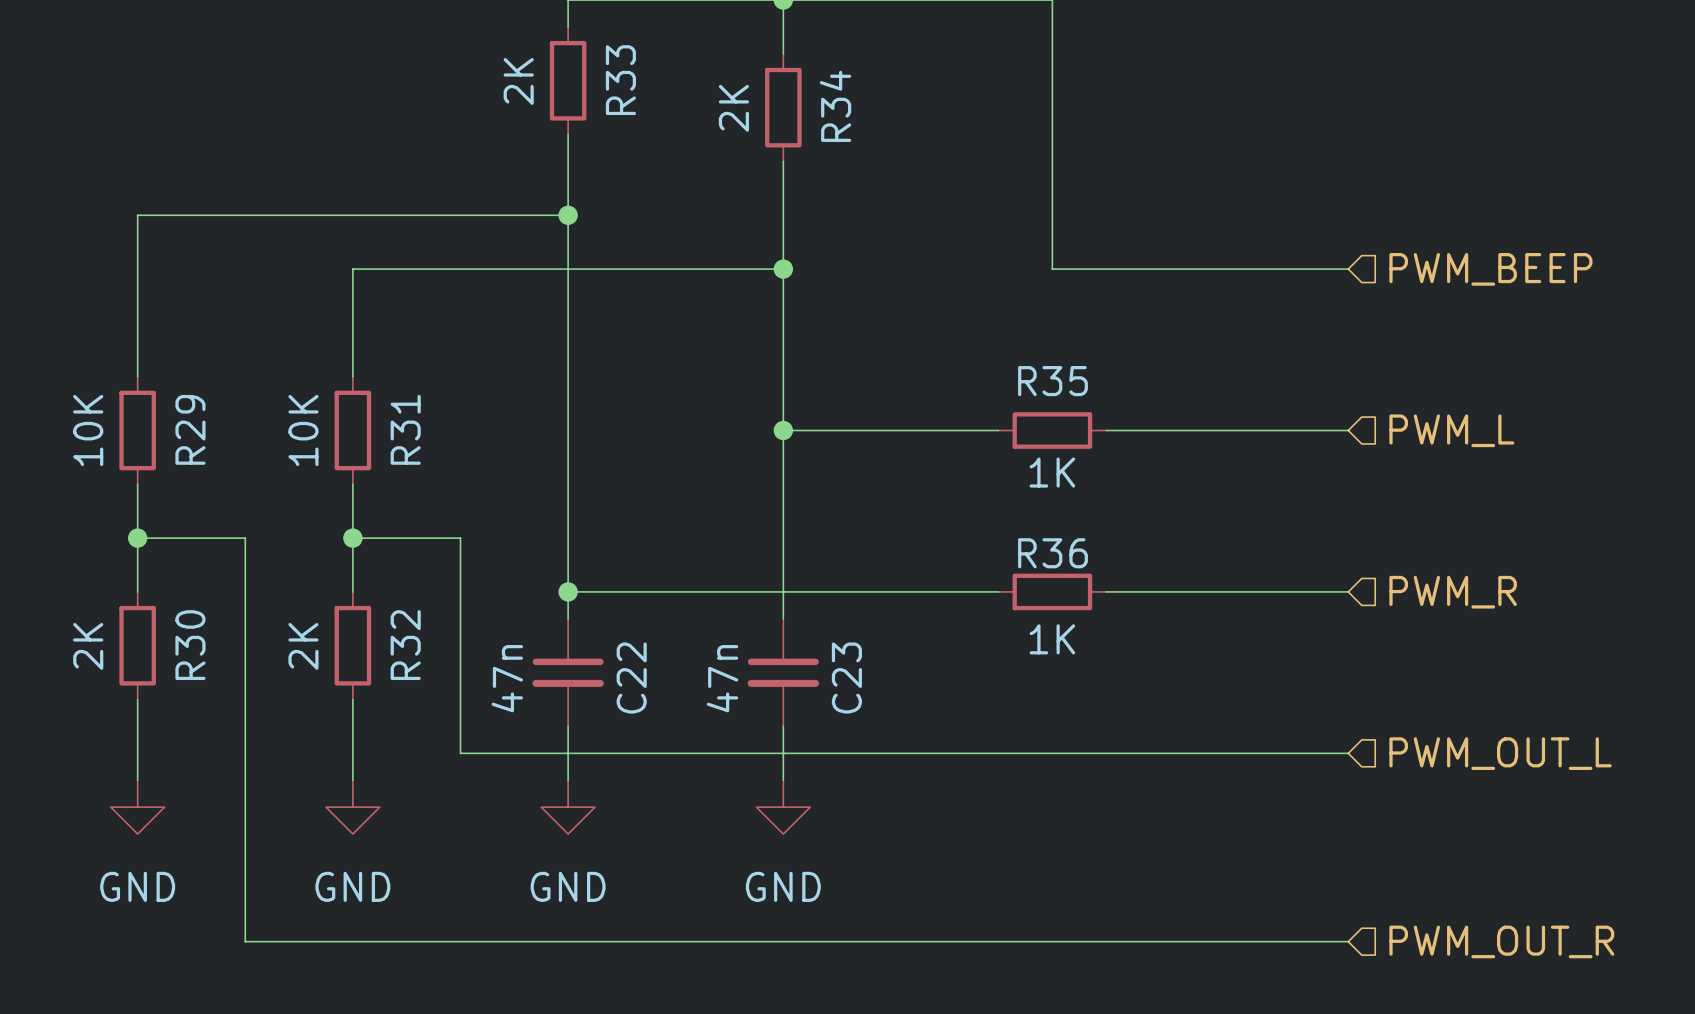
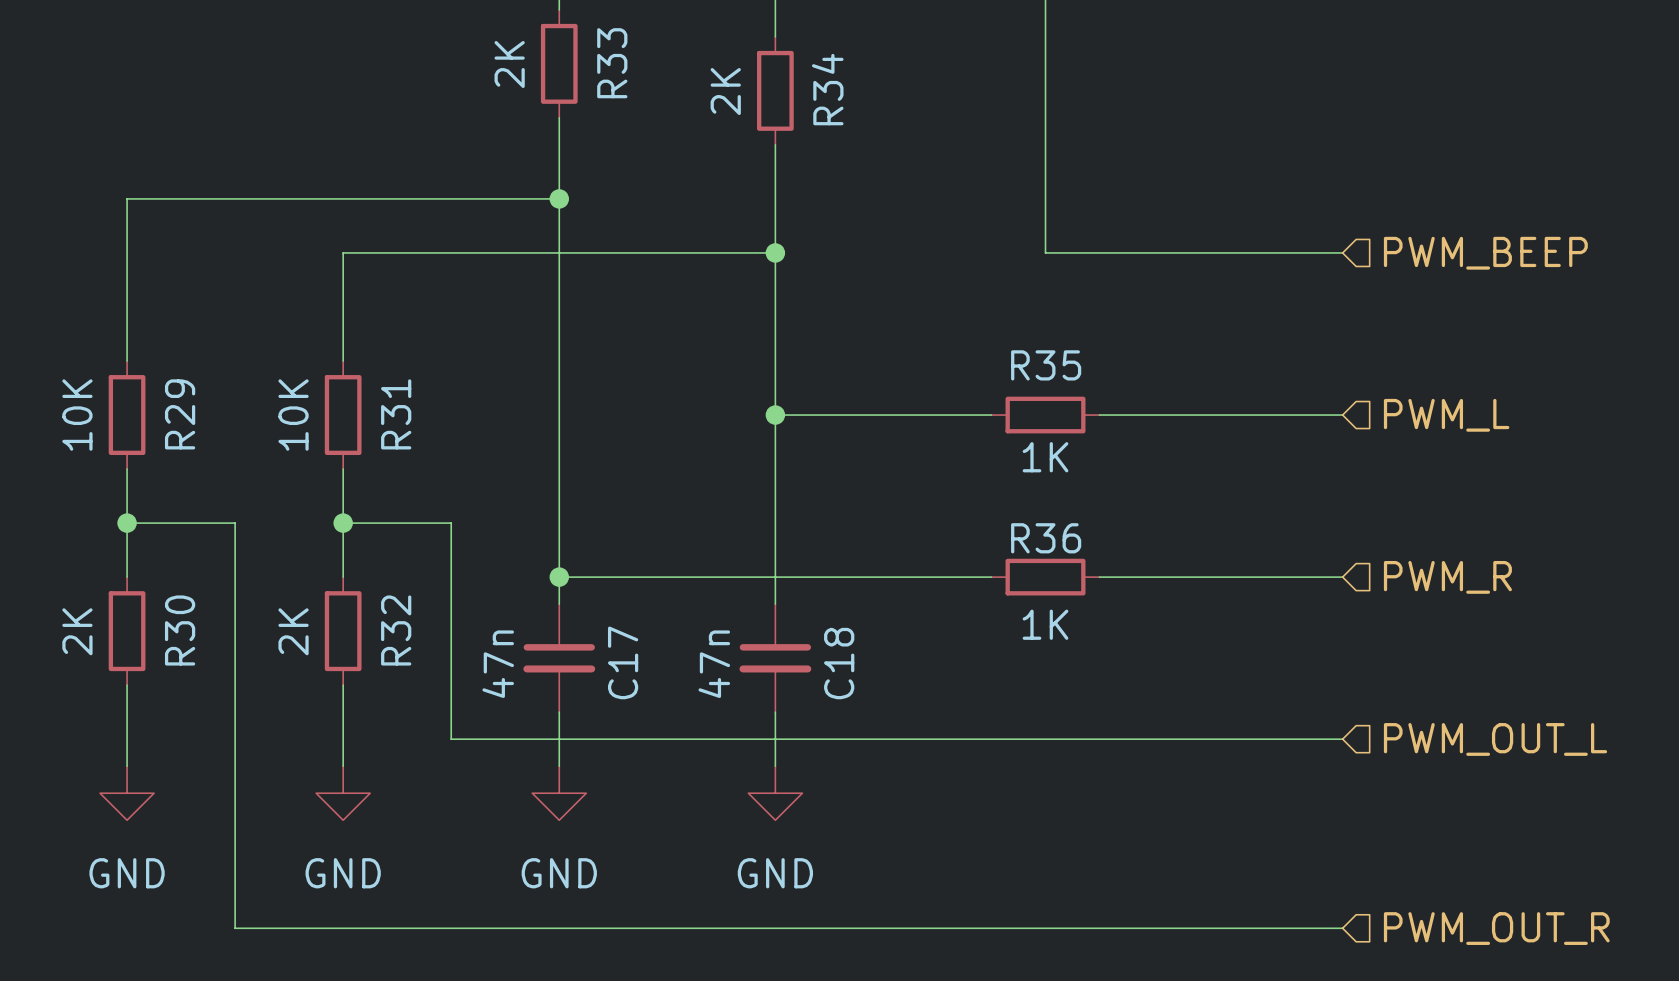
C22 name: C22 (631, 678) -> C17 (623, 662)
C23 name: C23 (846, 678) -> C18 (839, 663)

